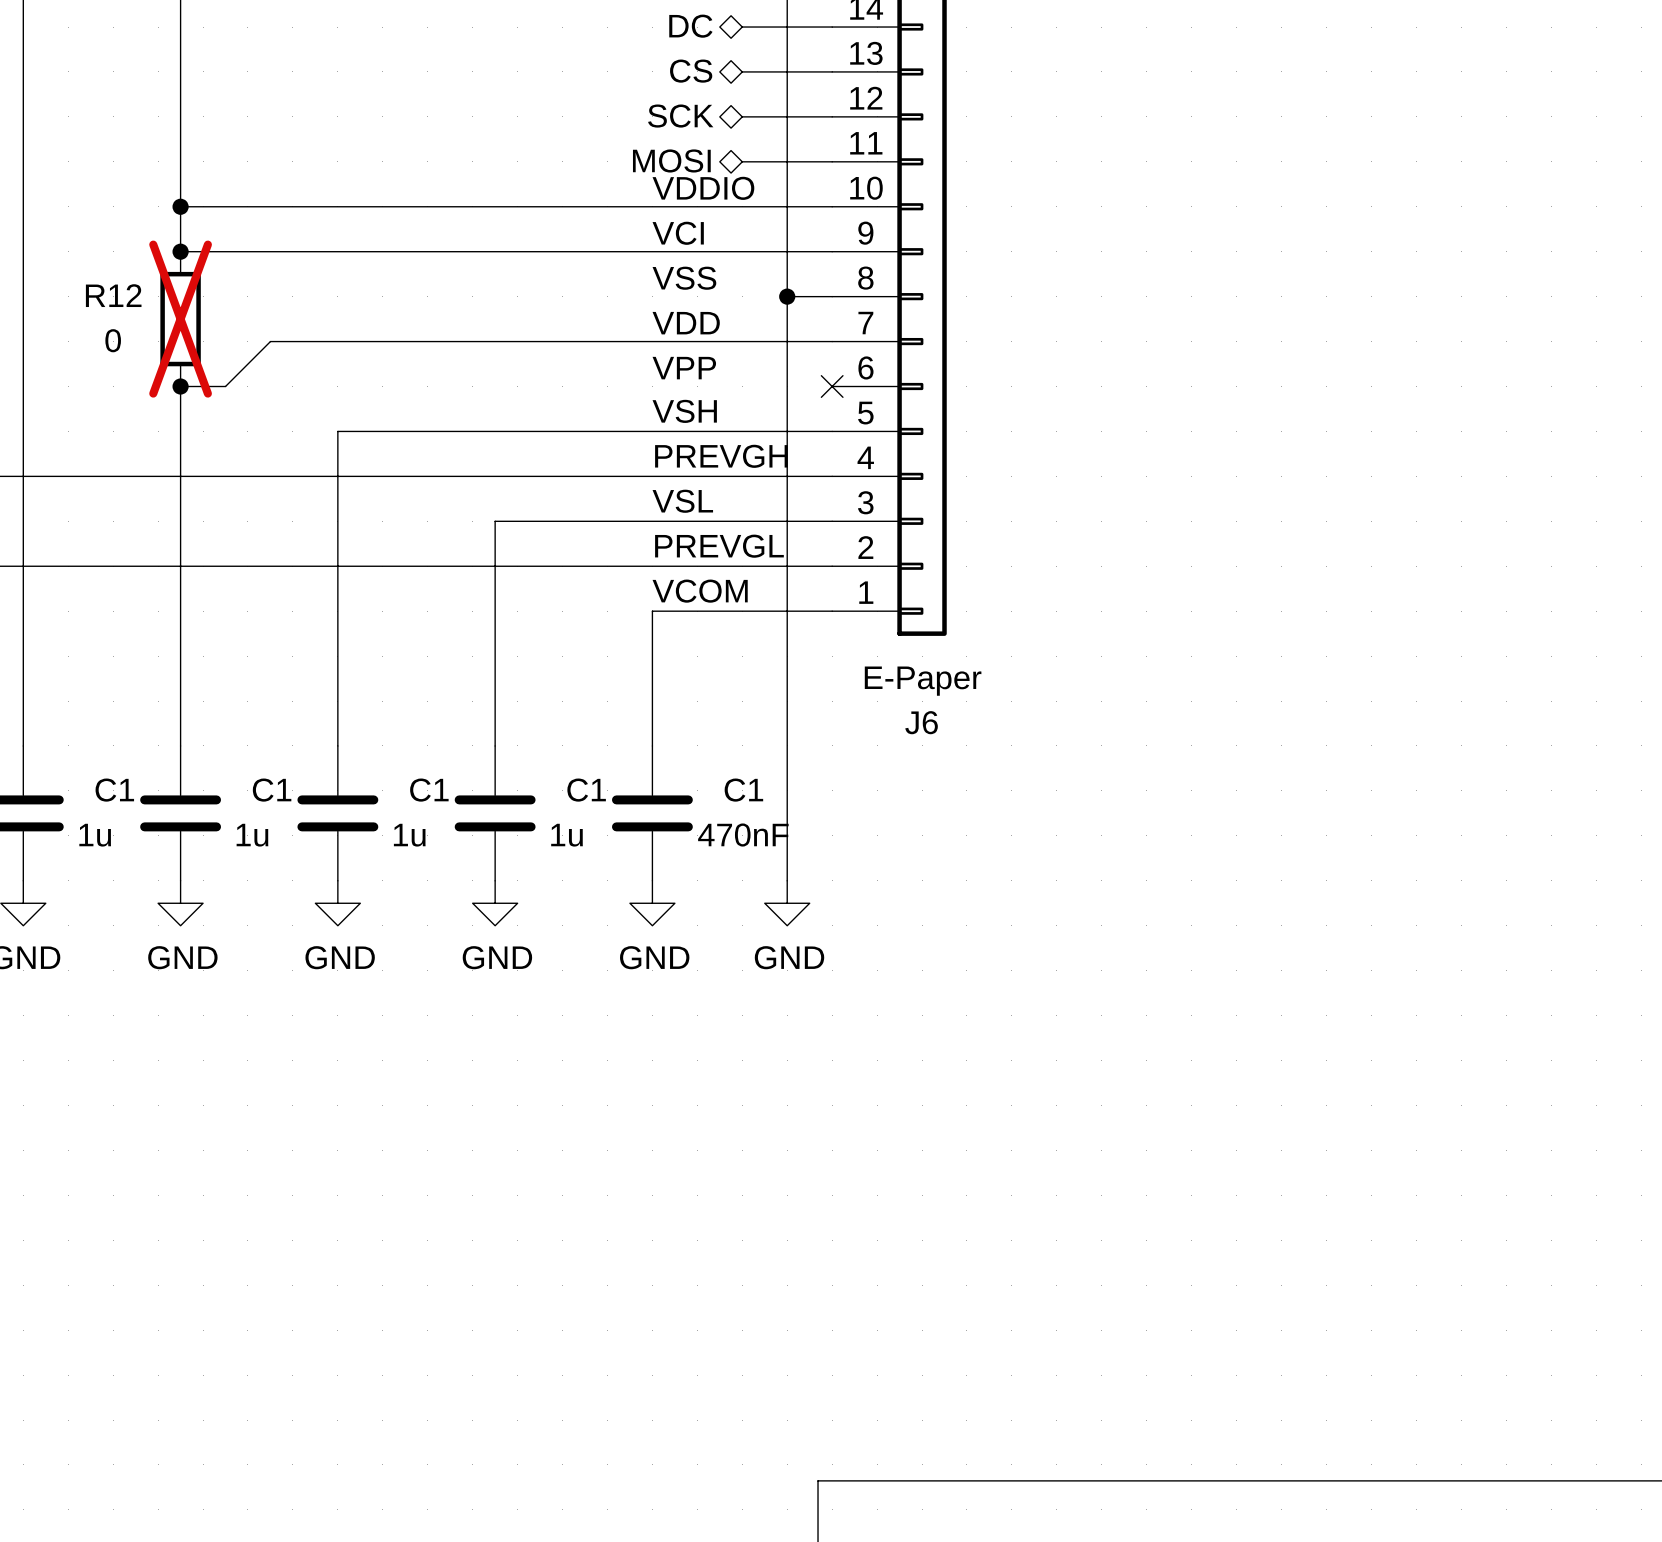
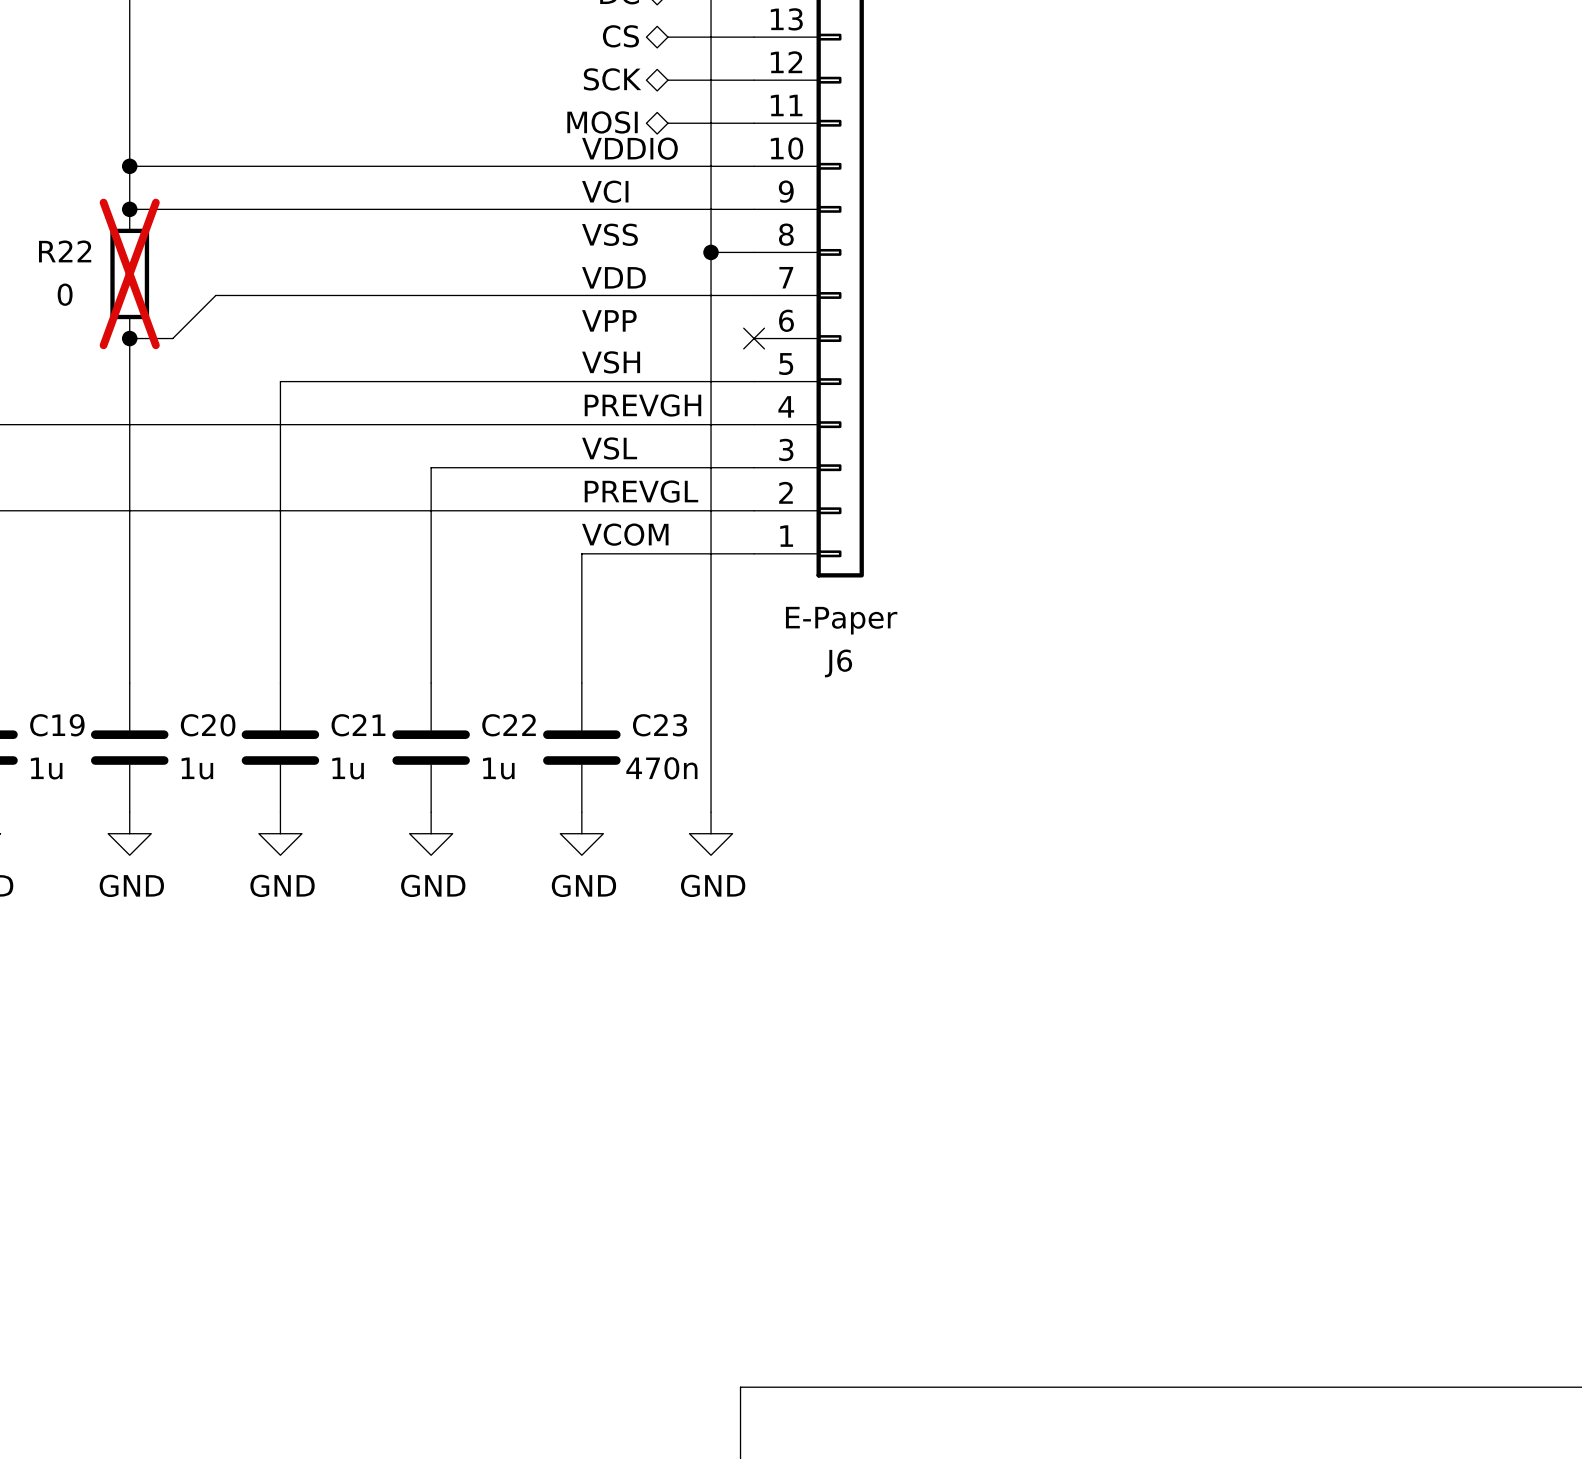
R12 name: R12 (113, 295) -> R22 (65, 251)
C1 name: C1 (114, 790) -> C19 (57, 725)
C1 name: C1 (272, 790) -> C20 (208, 725)
C1 name: C1 (429, 790) -> C21 (358, 725)
C1 name: C1 (586, 790) -> C22 (509, 725)
C1 name: C1 (743, 790) -> C23 (660, 725)
C1 value: 470nF (743, 835) -> 470n (661, 768)

